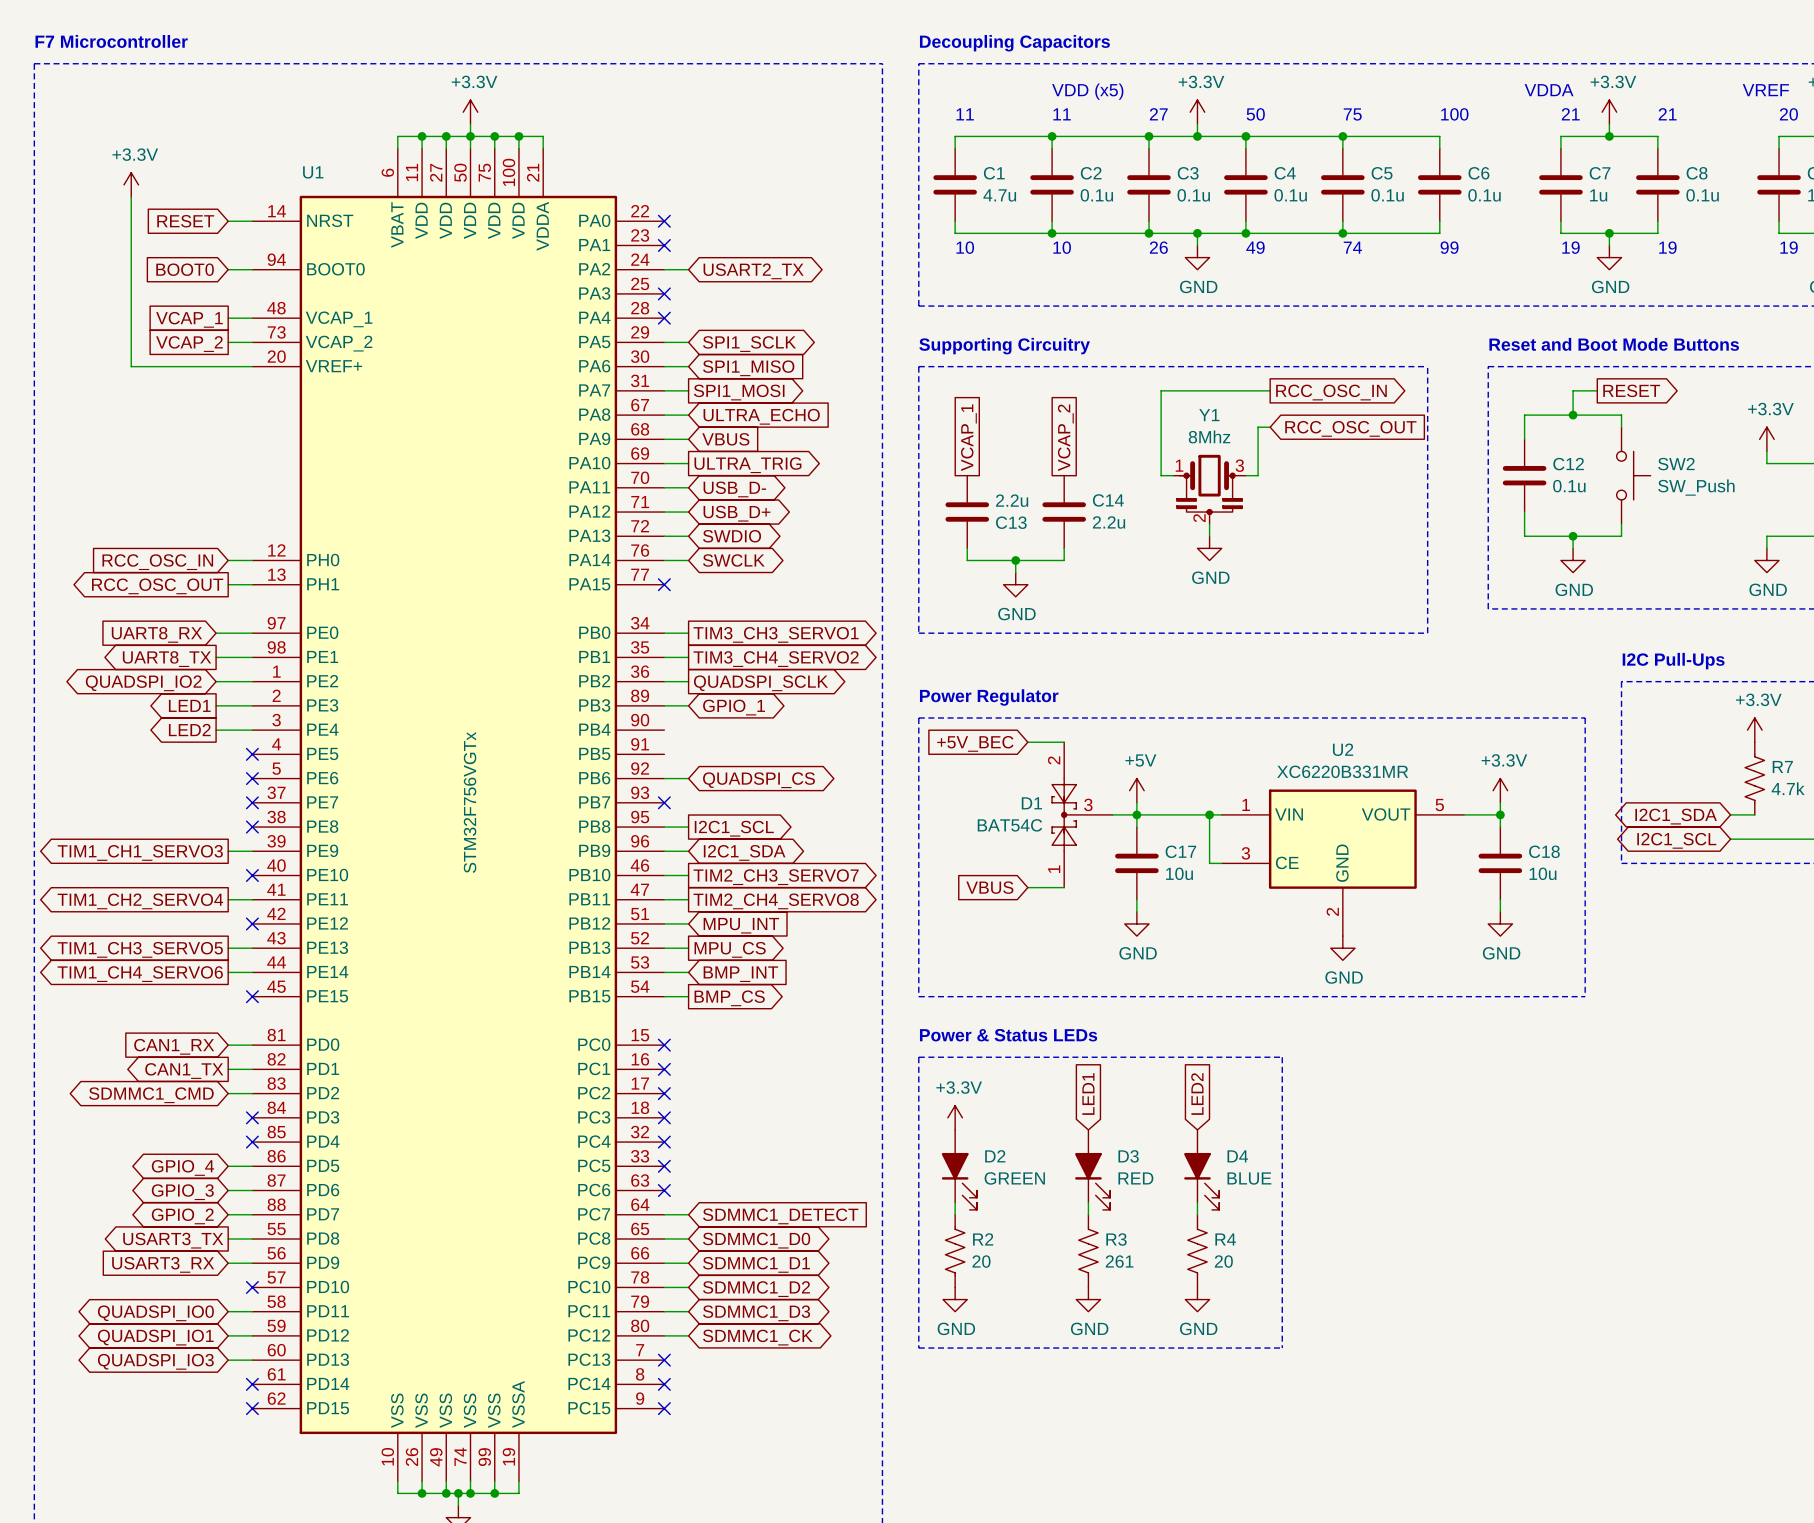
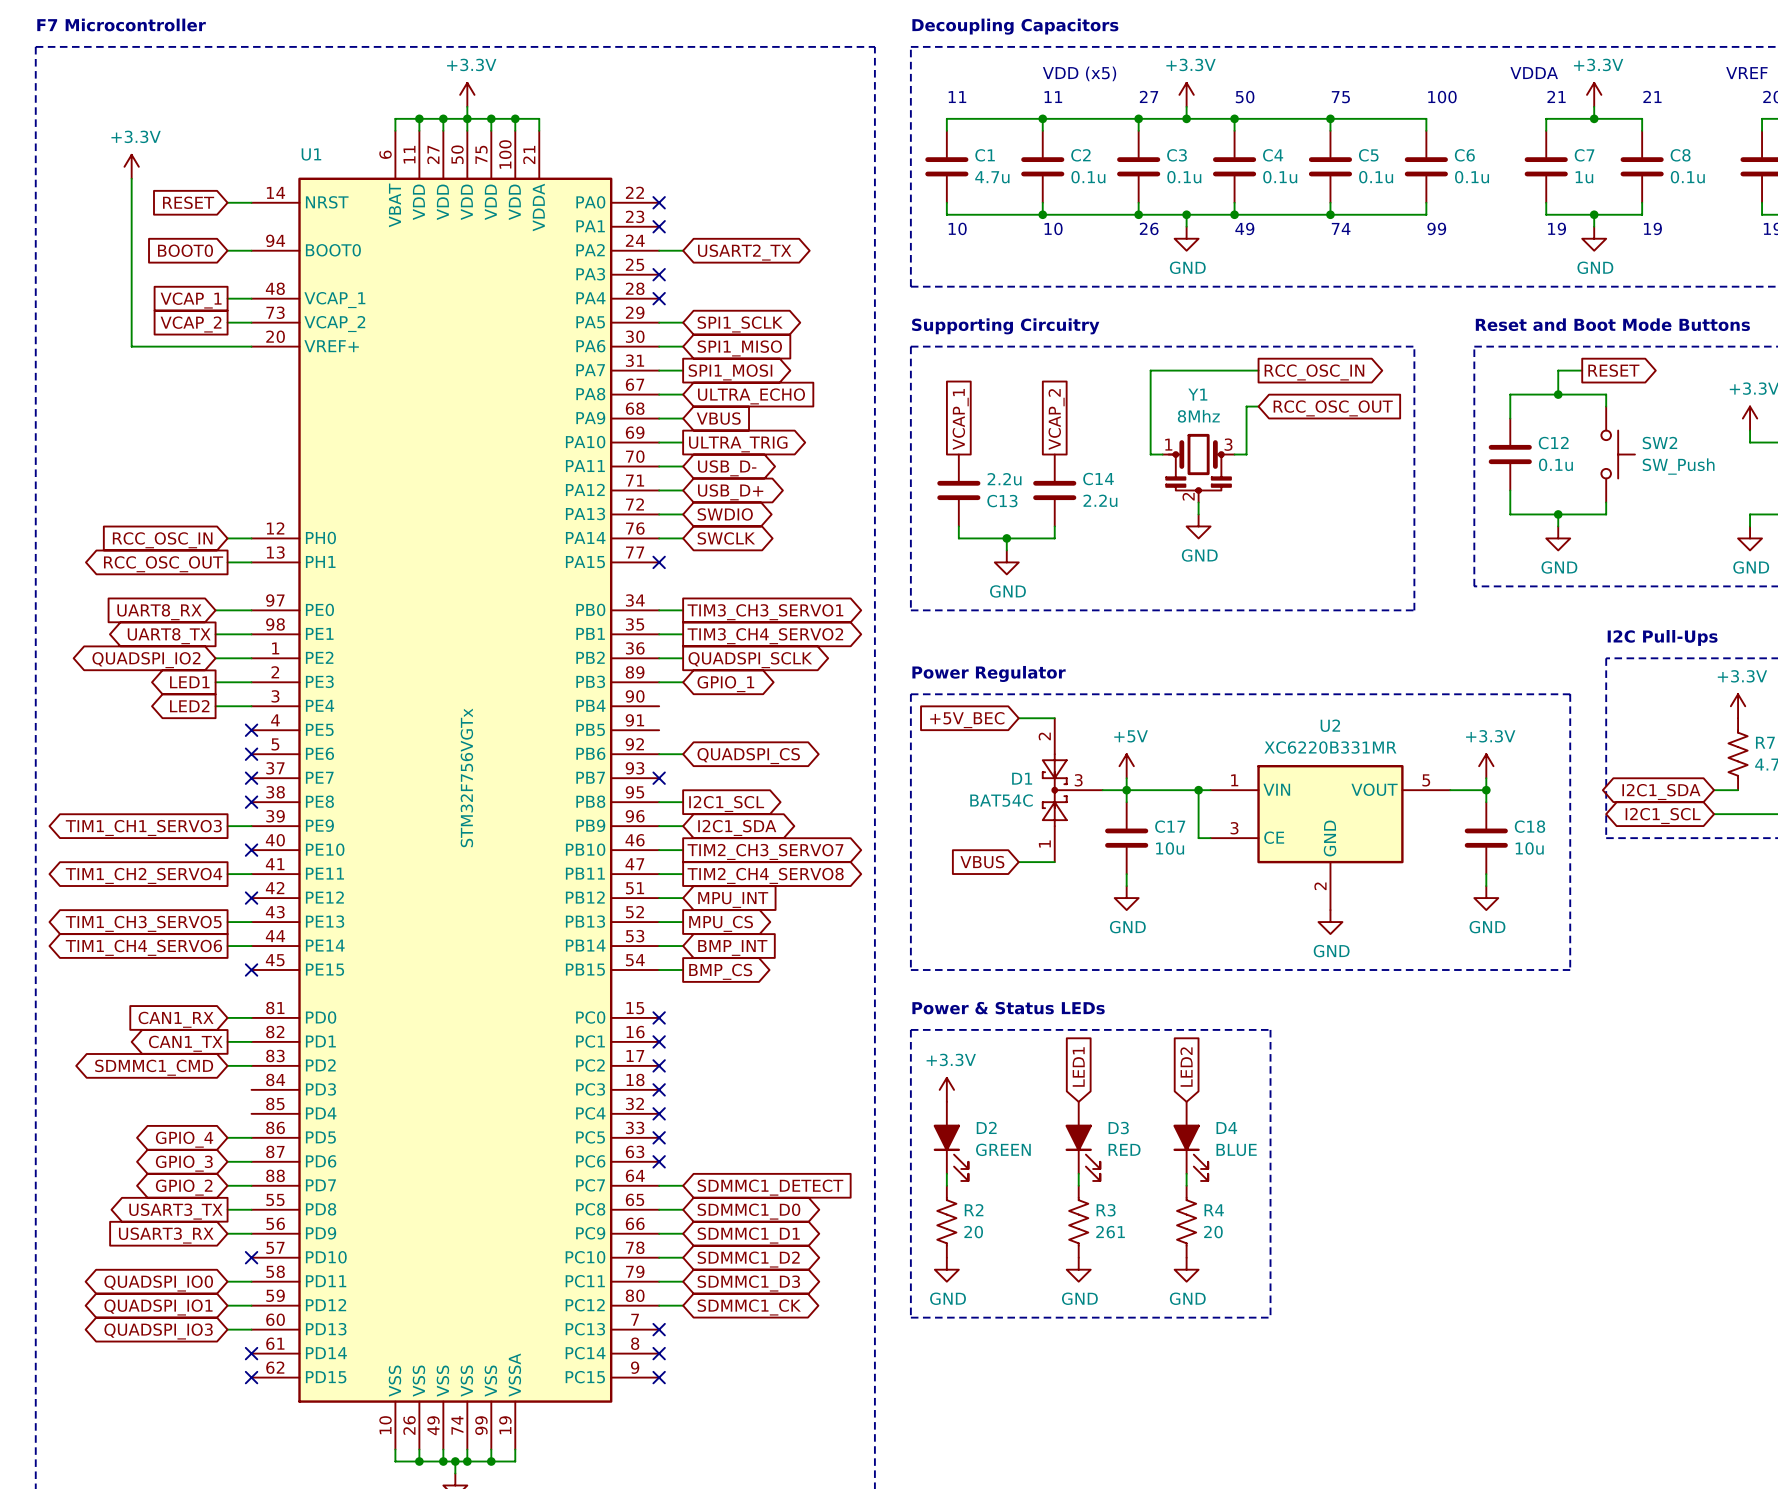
no-connect mark: (252, 1117) -> none
no-connect mark: (252, 1142) -> none

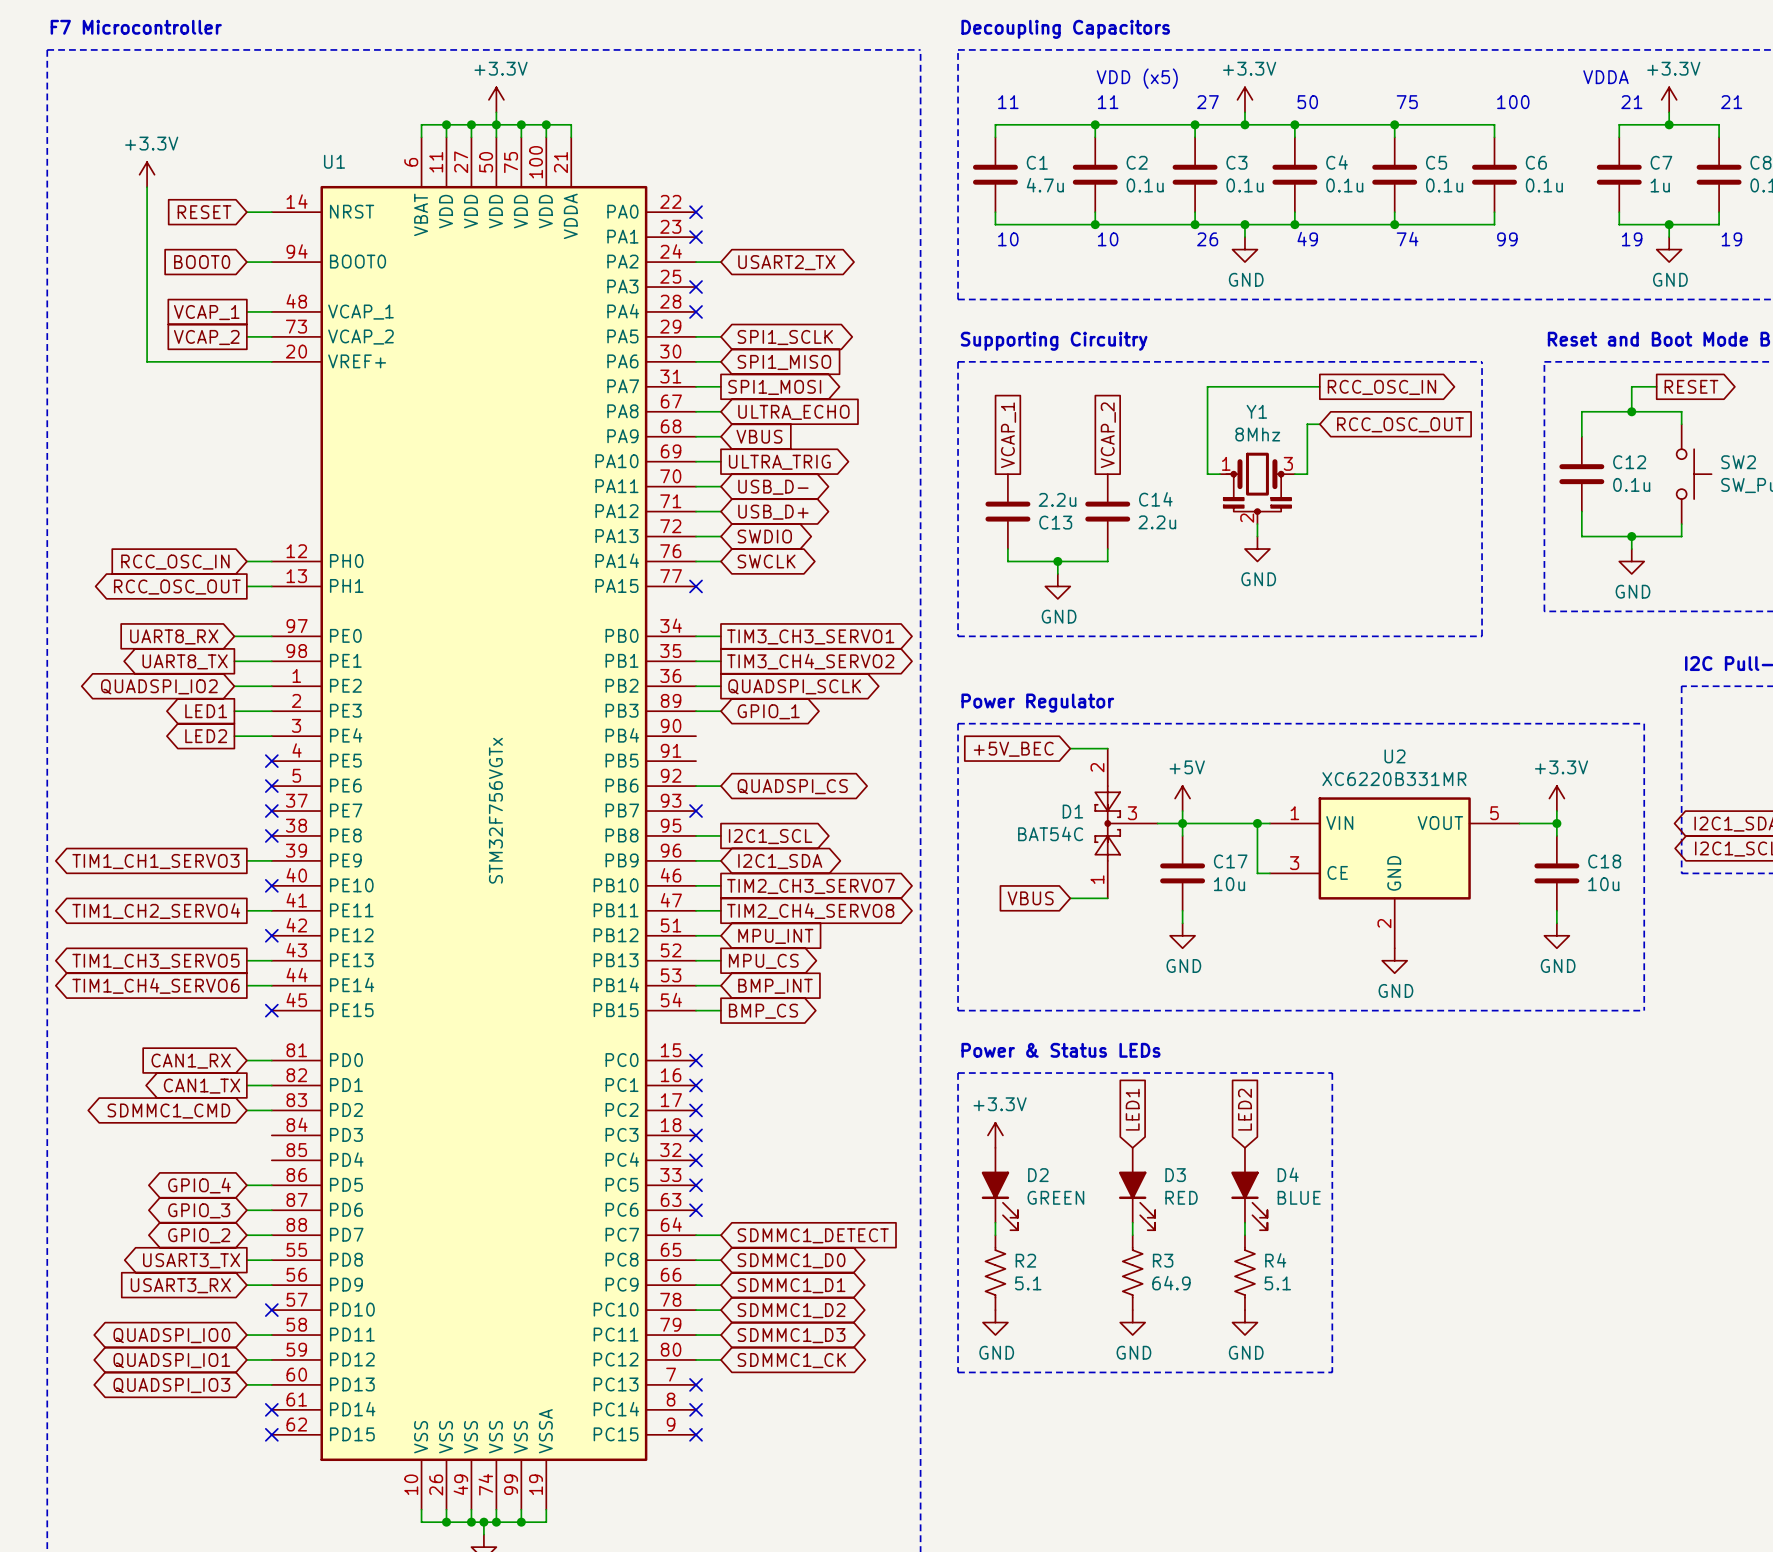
R2 value: 20 (973, 1232) -> 5.1 (1028, 1283)
R3 value: 261 (1110, 1232) -> 64.9 (1171, 1283)
R4 value: 20 (1213, 1232) -> 5.1 (1277, 1283)

